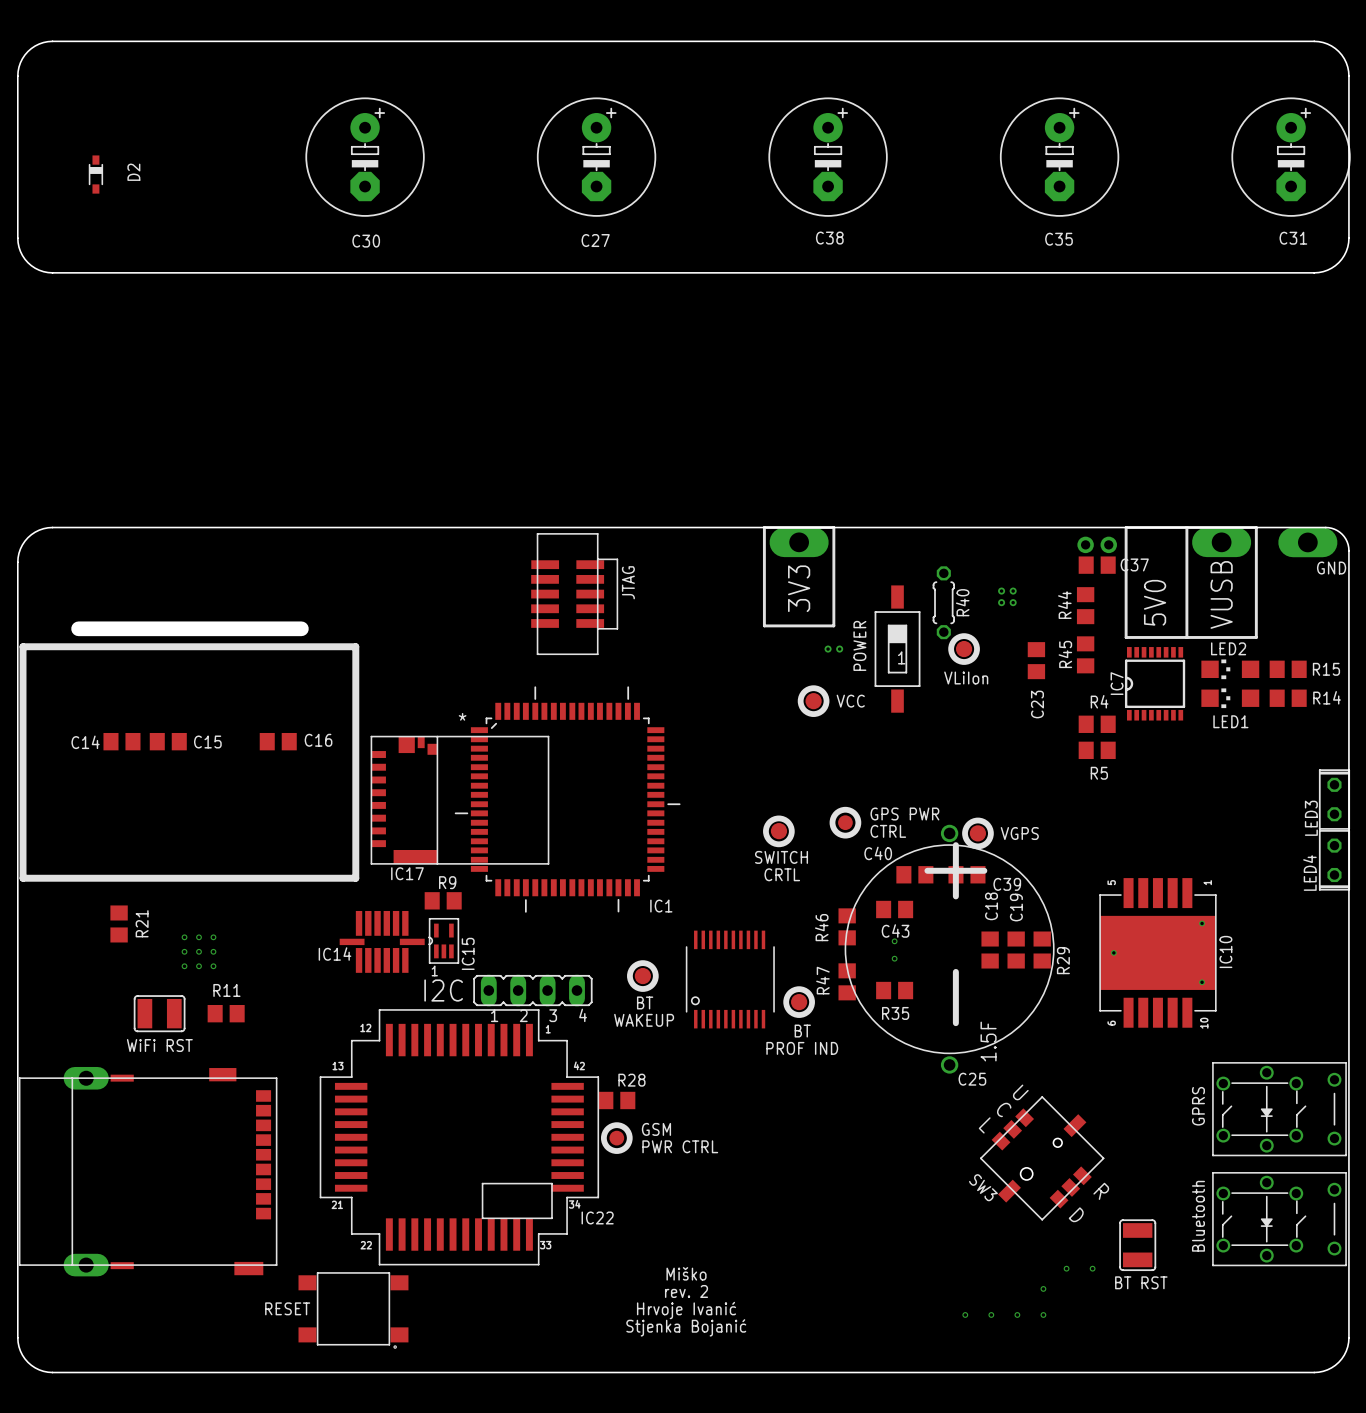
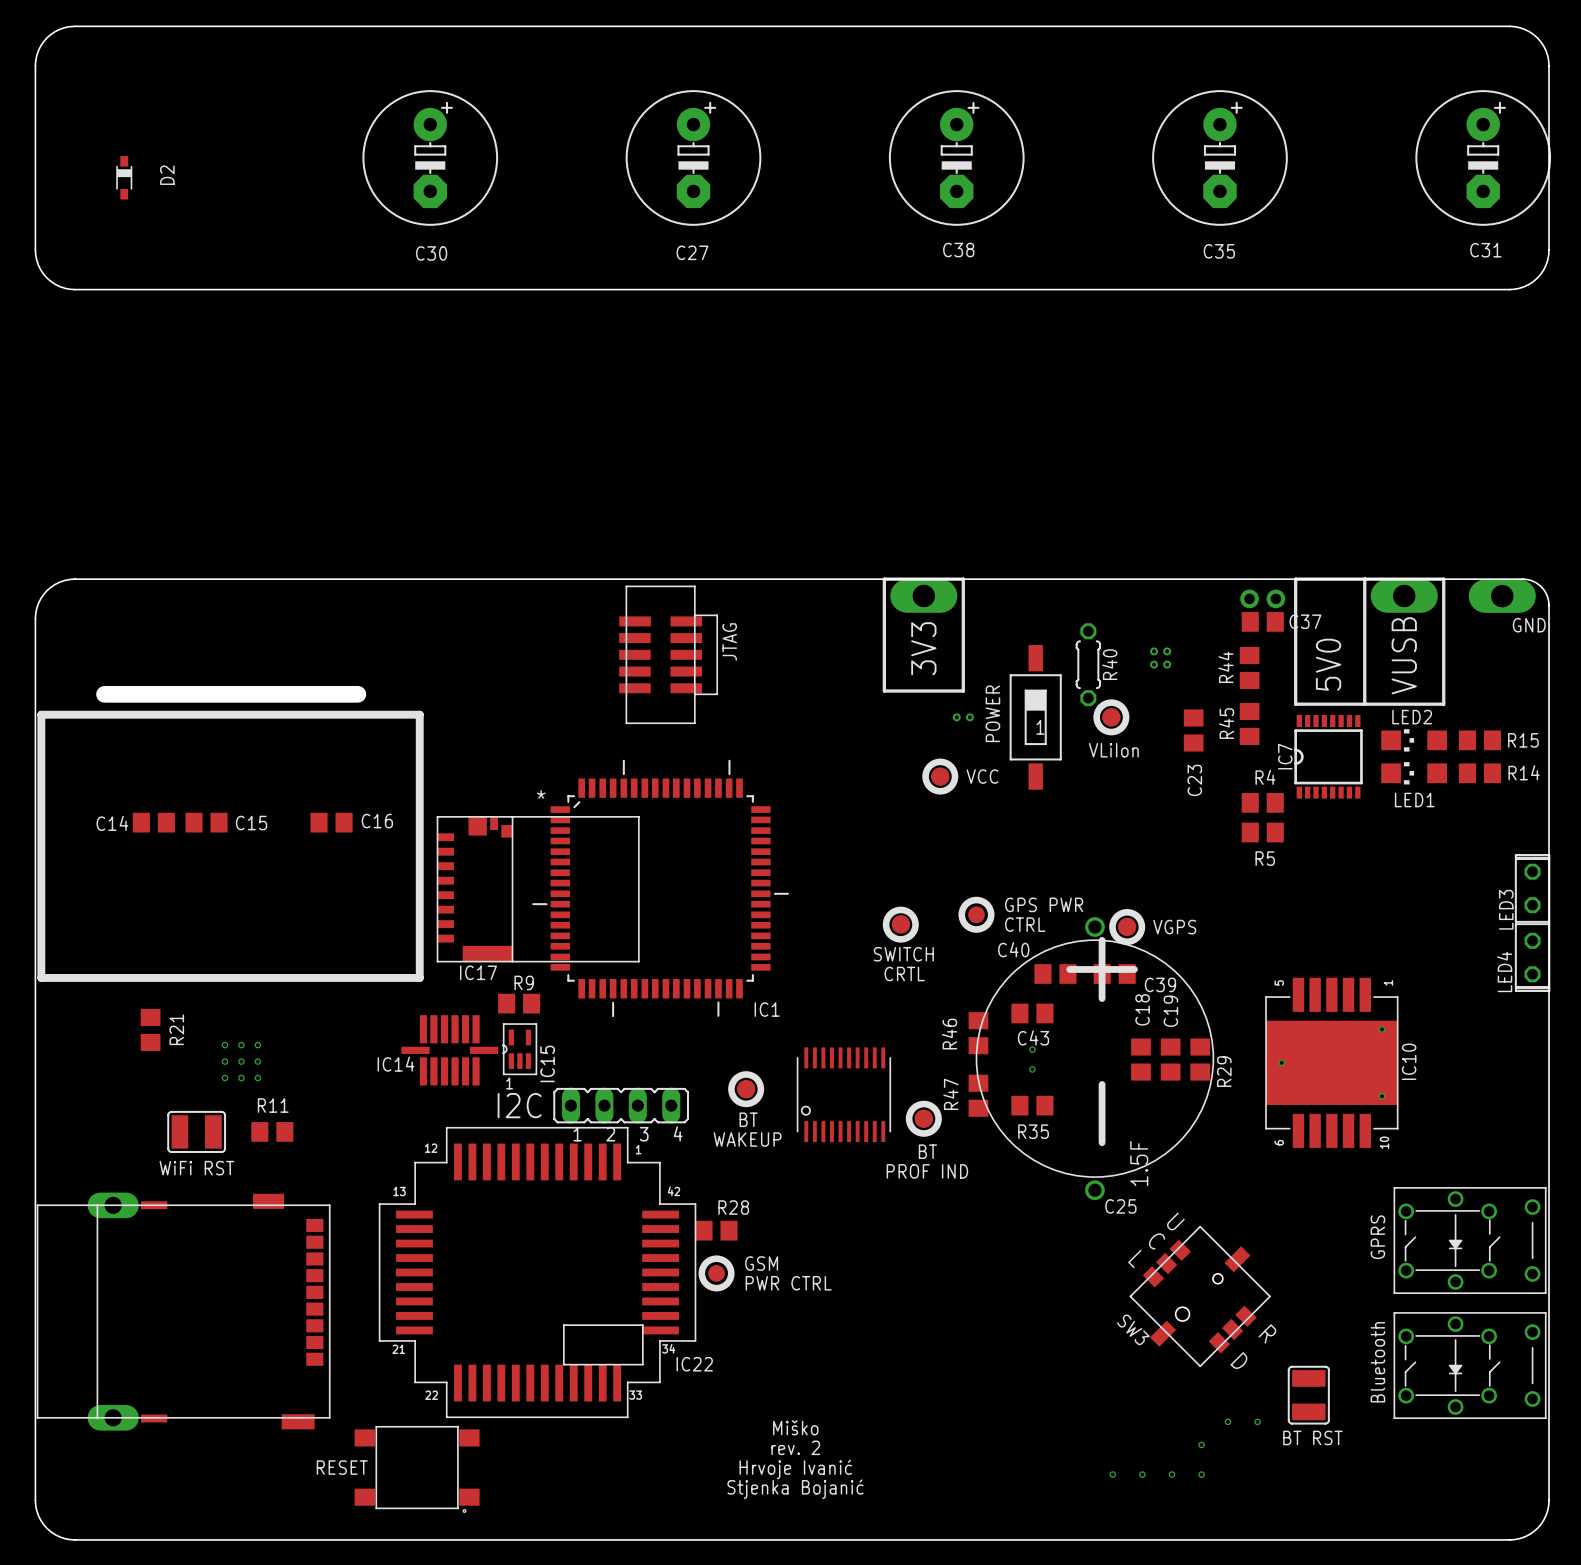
part footprint: [685, 930, 775, 1029] -> [796, 1047, 892, 1143]

